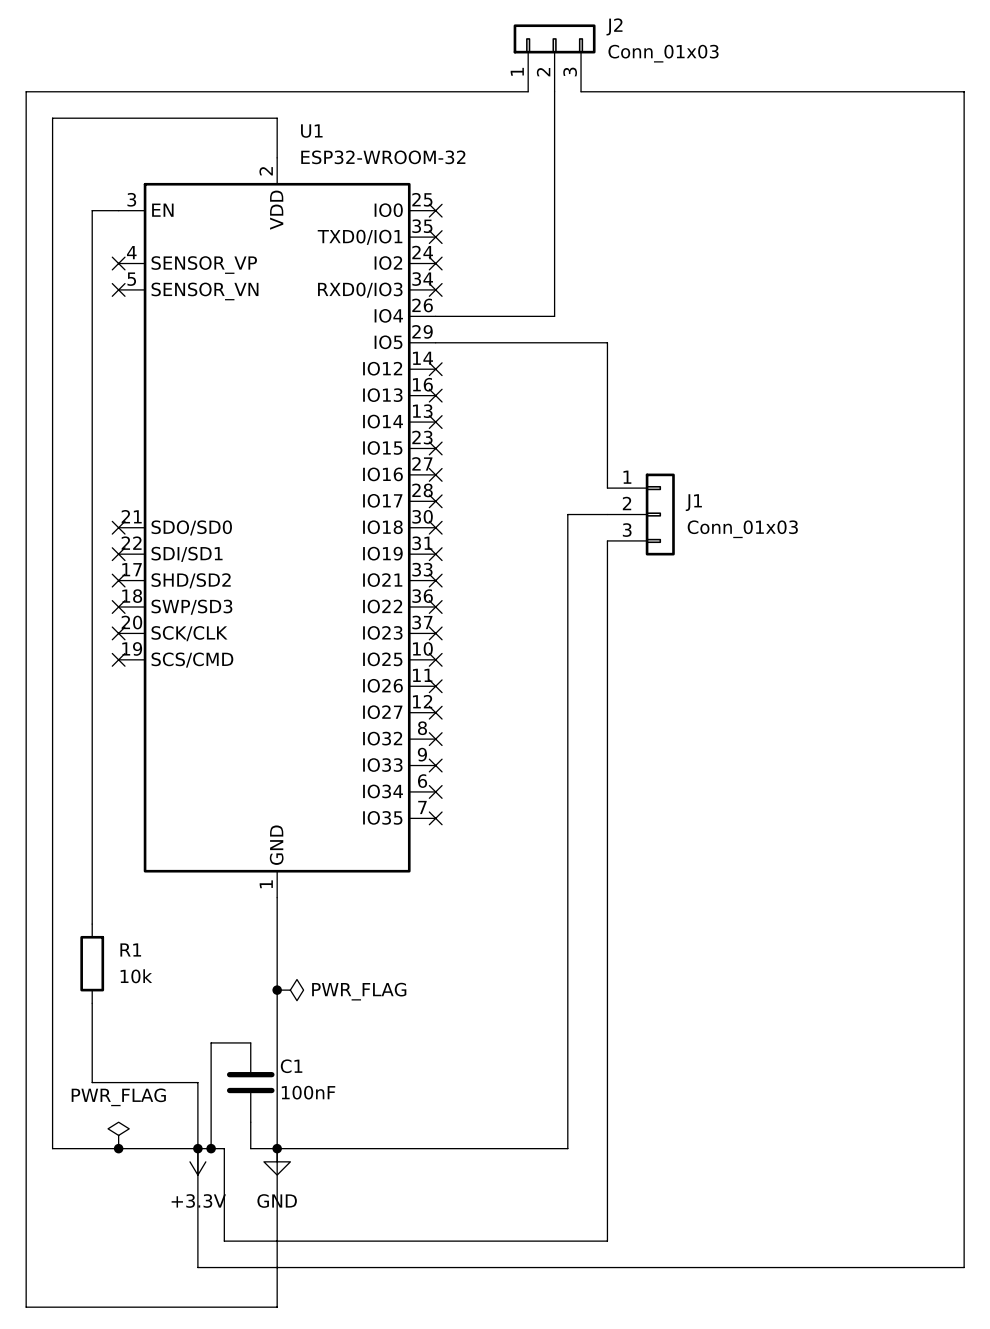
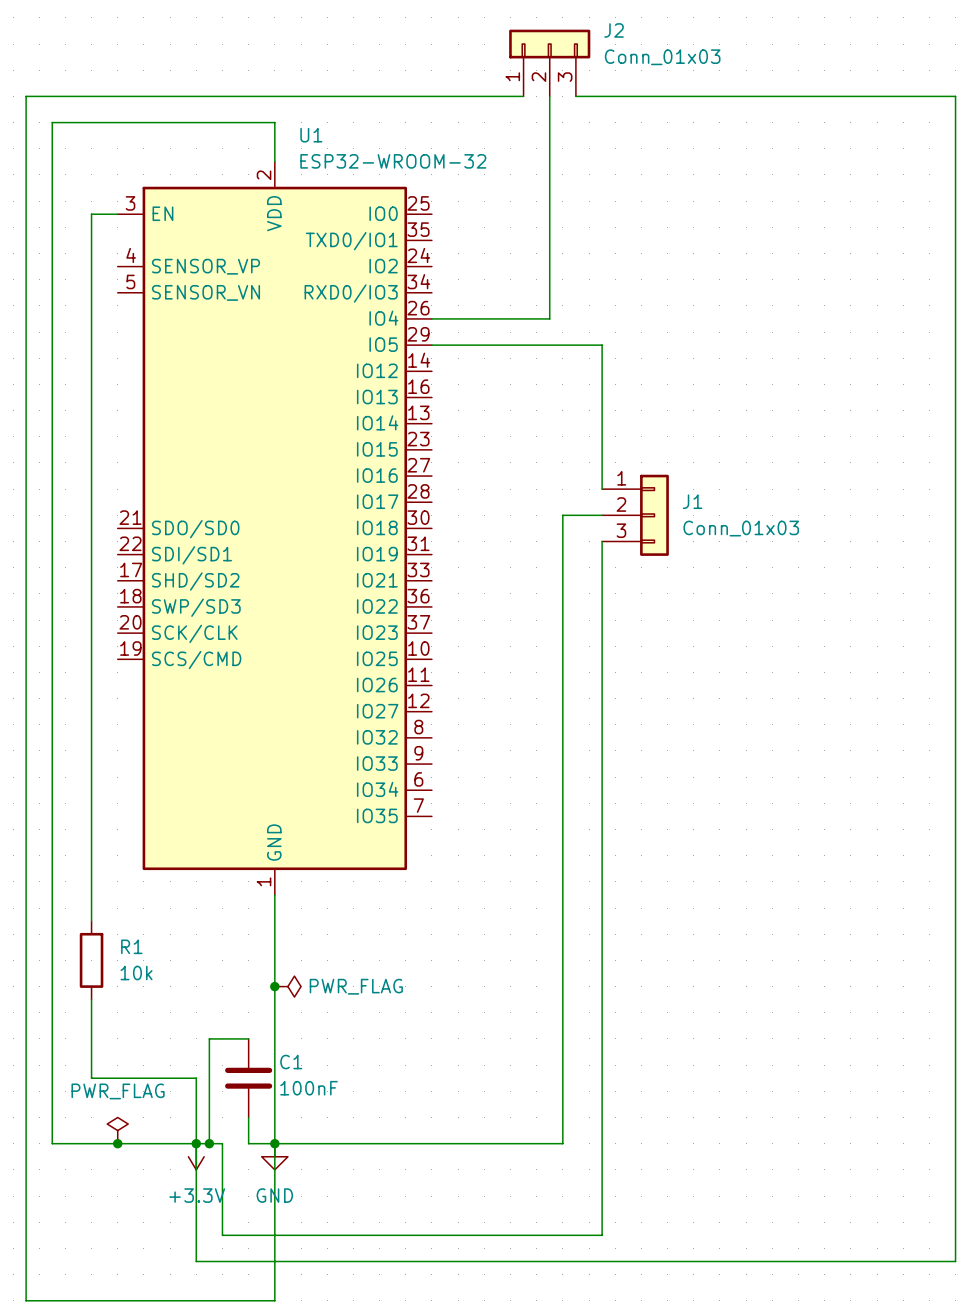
no-connect mark: (435, 210) -> none
no-connect mark: (435, 237) -> none
no-connect mark: (118, 263) -> none
no-connect mark: (435, 263) -> none
no-connect mark: (118, 289) -> none
no-connect mark: (435, 289) -> none
no-connect mark: (435, 369) -> none
no-connect mark: (435, 395) -> none
no-connect mark: (435, 422) -> none
no-connect mark: (435, 448) -> none
no-connect mark: (435, 474) -> none
no-connect mark: (435, 501) -> none
no-connect mark: (118, 527) -> none
no-connect mark: (435, 527) -> none
no-connect mark: (118, 554) -> none
no-connect mark: (435, 554) -> none
no-connect mark: (118, 580) -> none
no-connect mark: (435, 580) -> none
no-connect mark: (118, 607) -> none
no-connect mark: (435, 607) -> none
no-connect mark: (118, 633) -> none
no-connect mark: (435, 633) -> none
no-connect mark: (118, 659) -> none
no-connect mark: (435, 659) -> none
no-connect mark: (435, 686) -> none
no-connect mark: (435, 712) -> none
no-connect mark: (435, 739) -> none
no-connect mark: (435, 765) -> none
no-connect mark: (435, 791) -> none
no-connect mark: (435, 818) -> none

